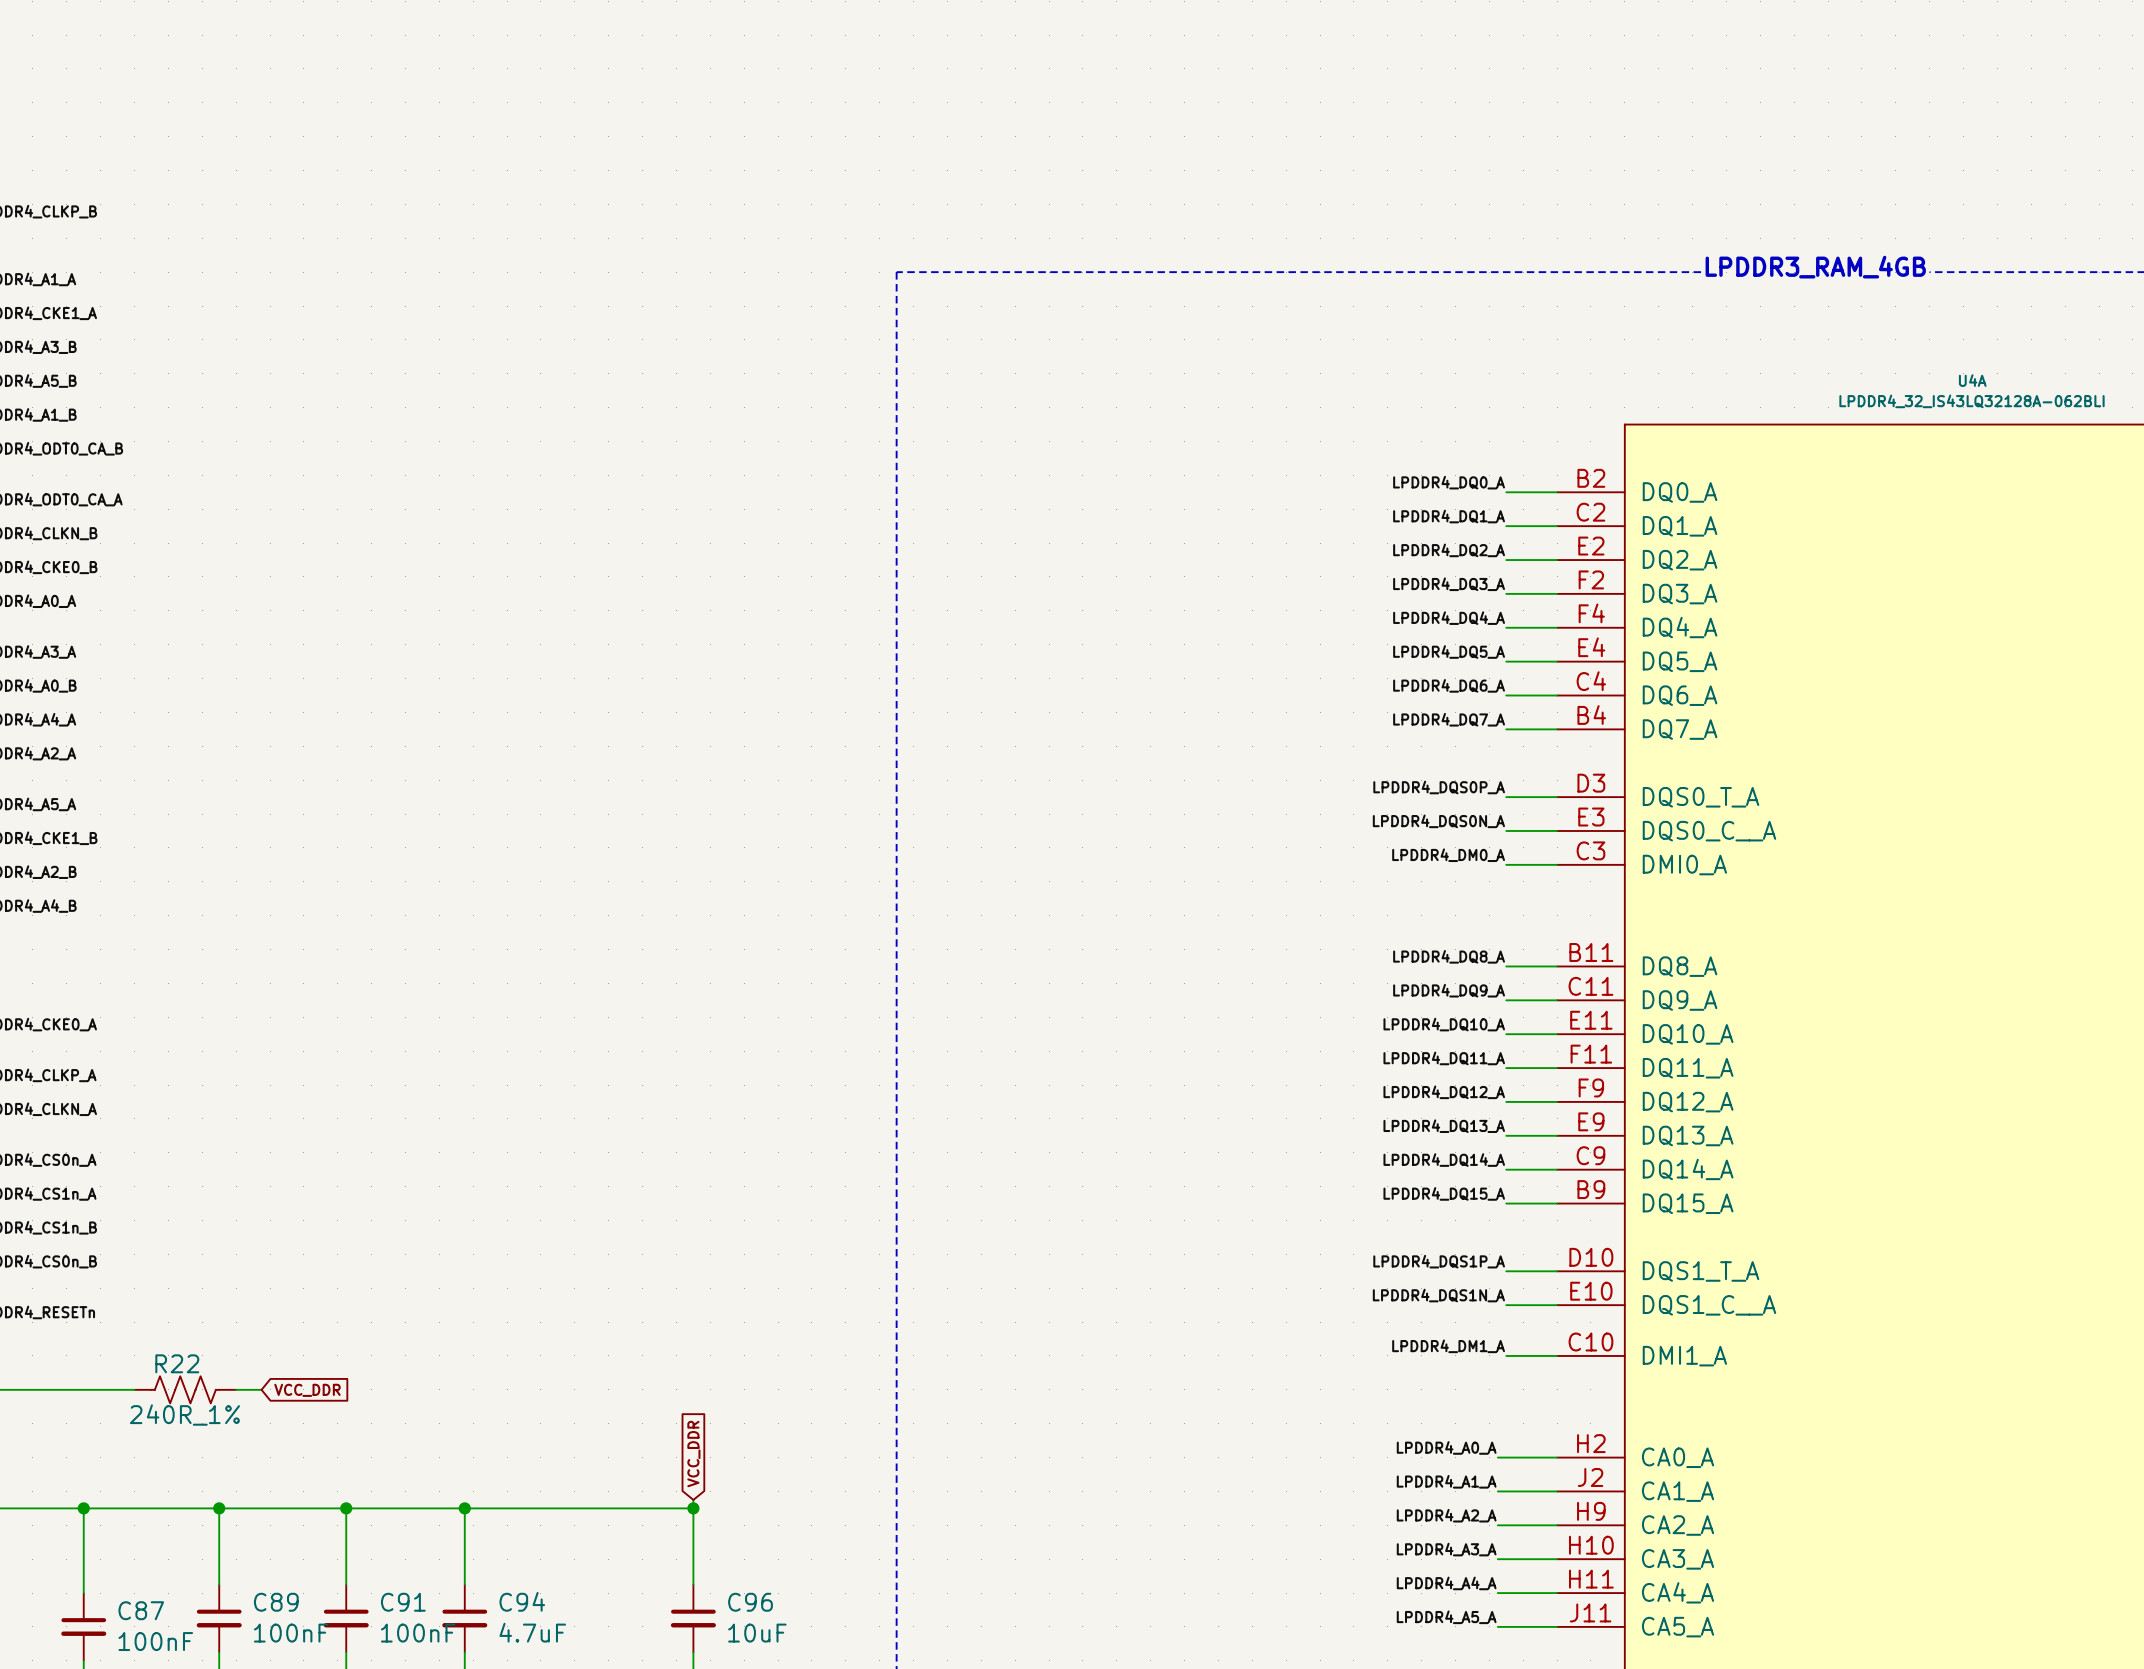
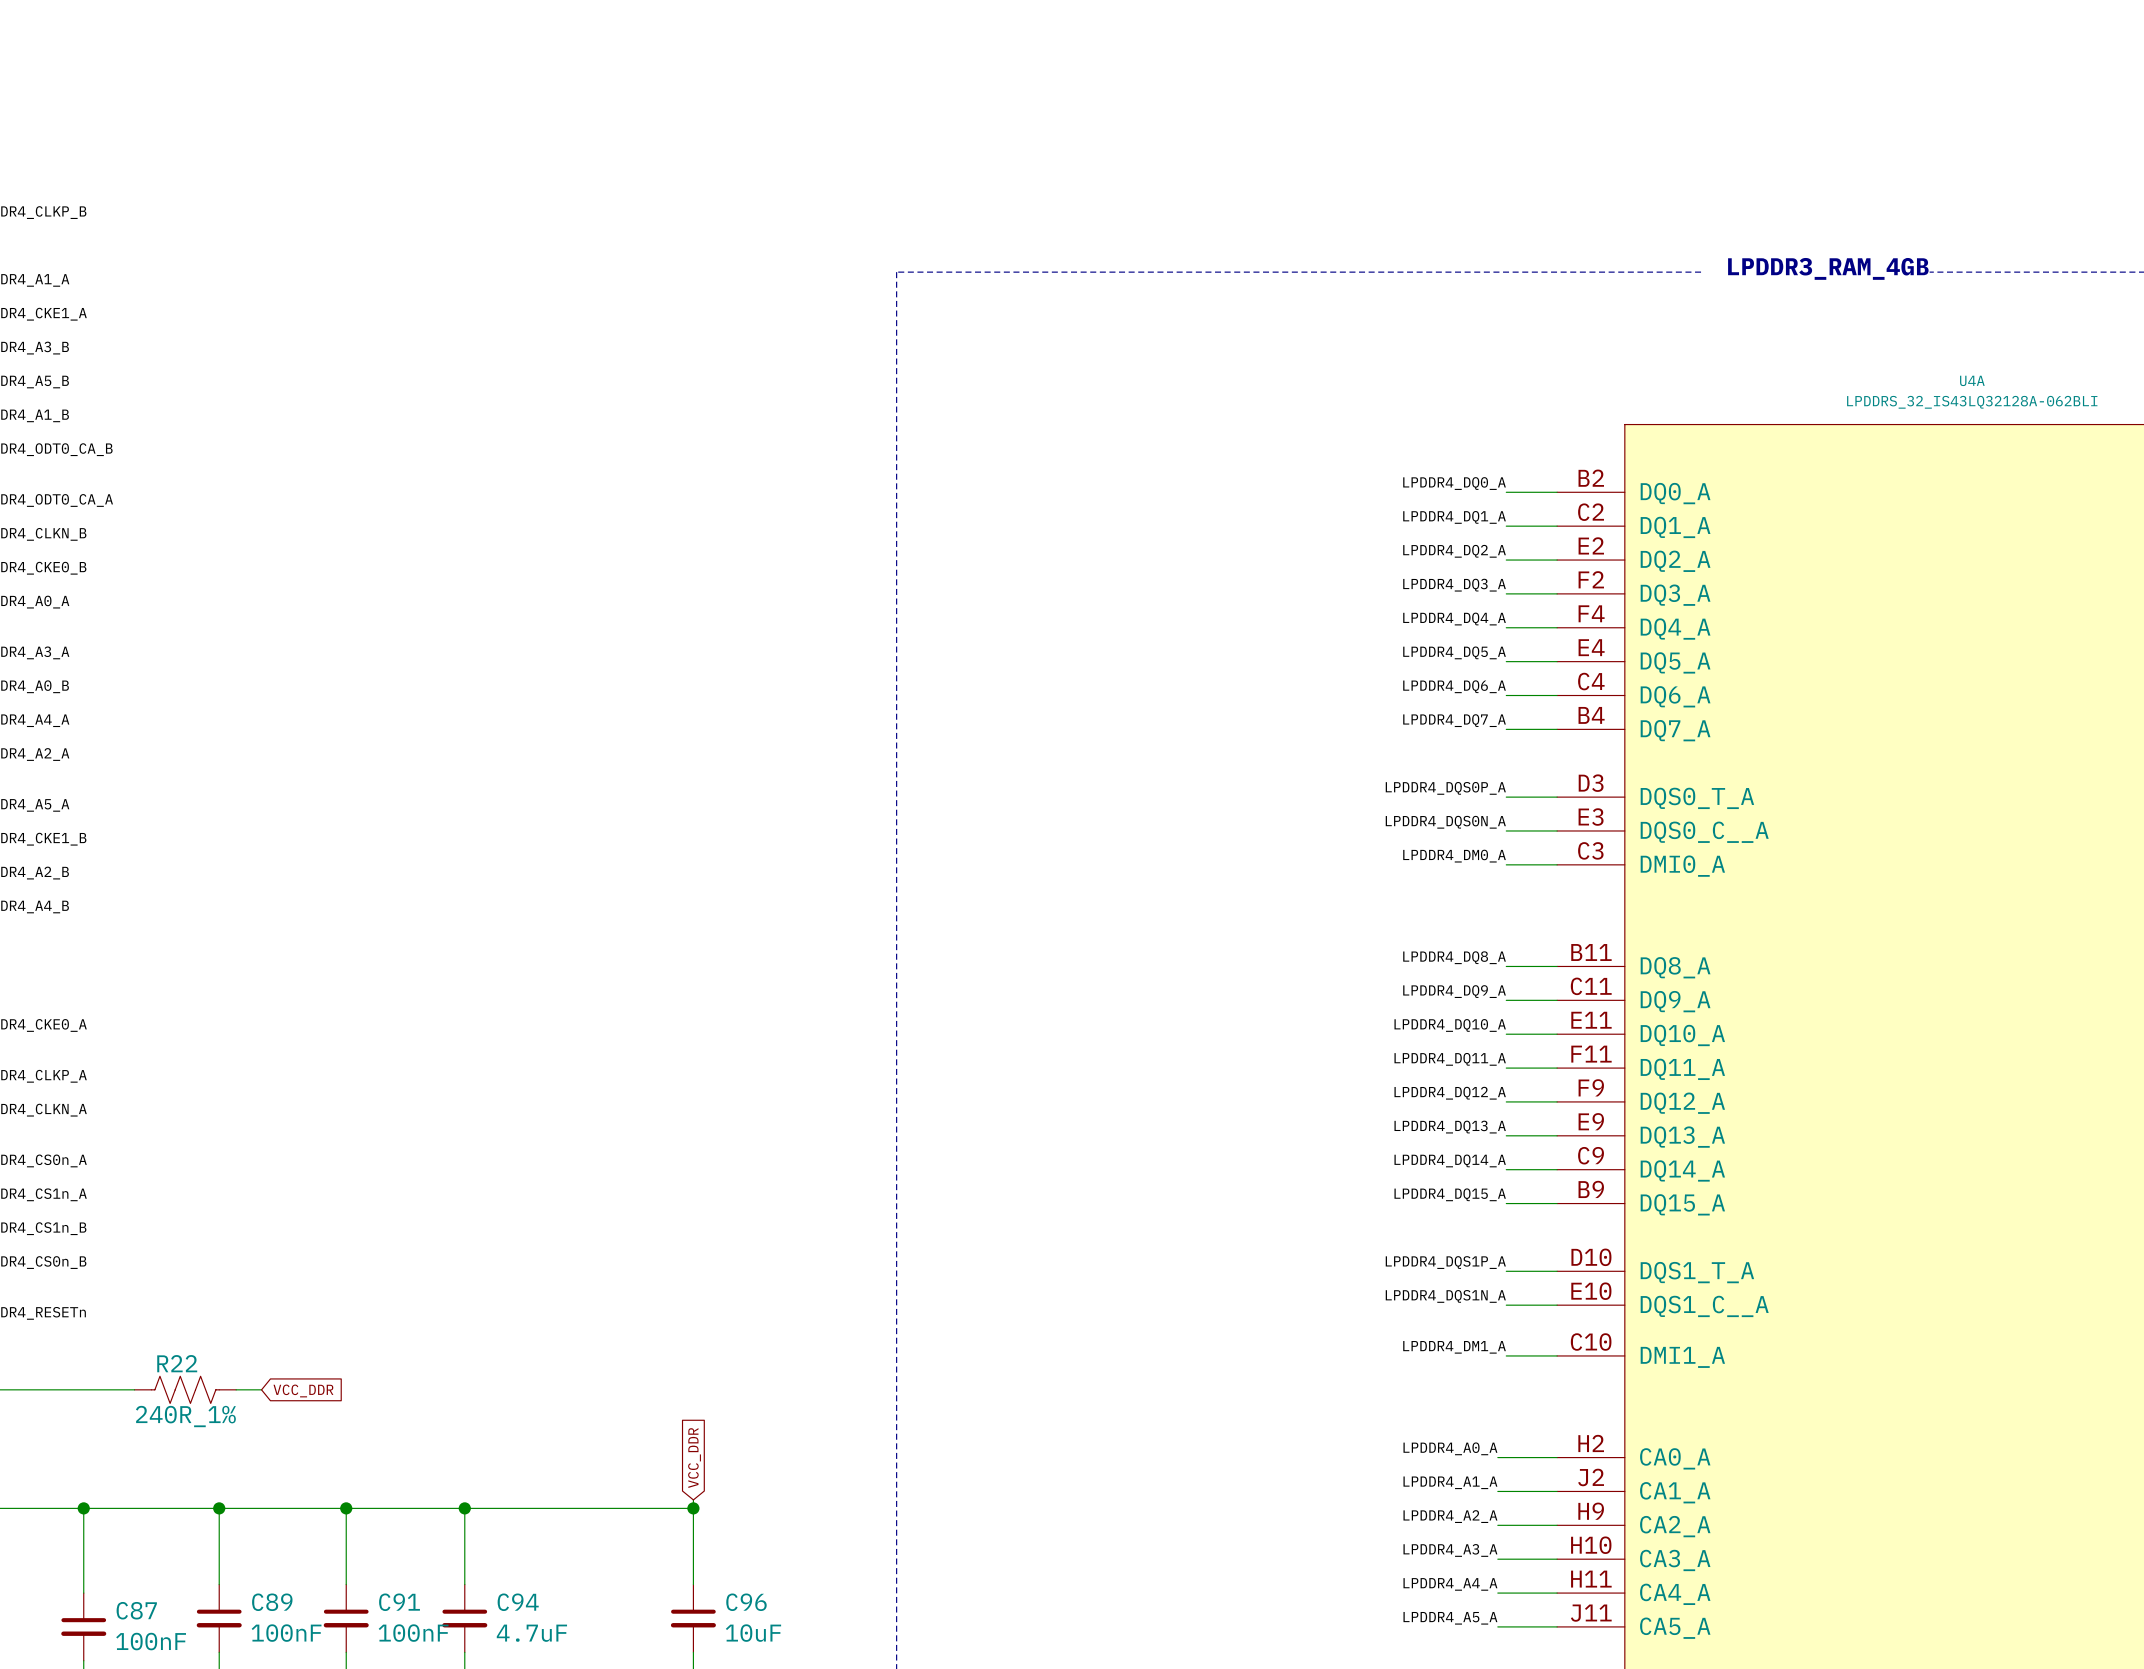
U4A value: LPDDR4_32_IS43LQ32128A-062BLI (1972, 401) -> LPDDRS_32_IS43LQ32128A-062BLI (1972, 402)

